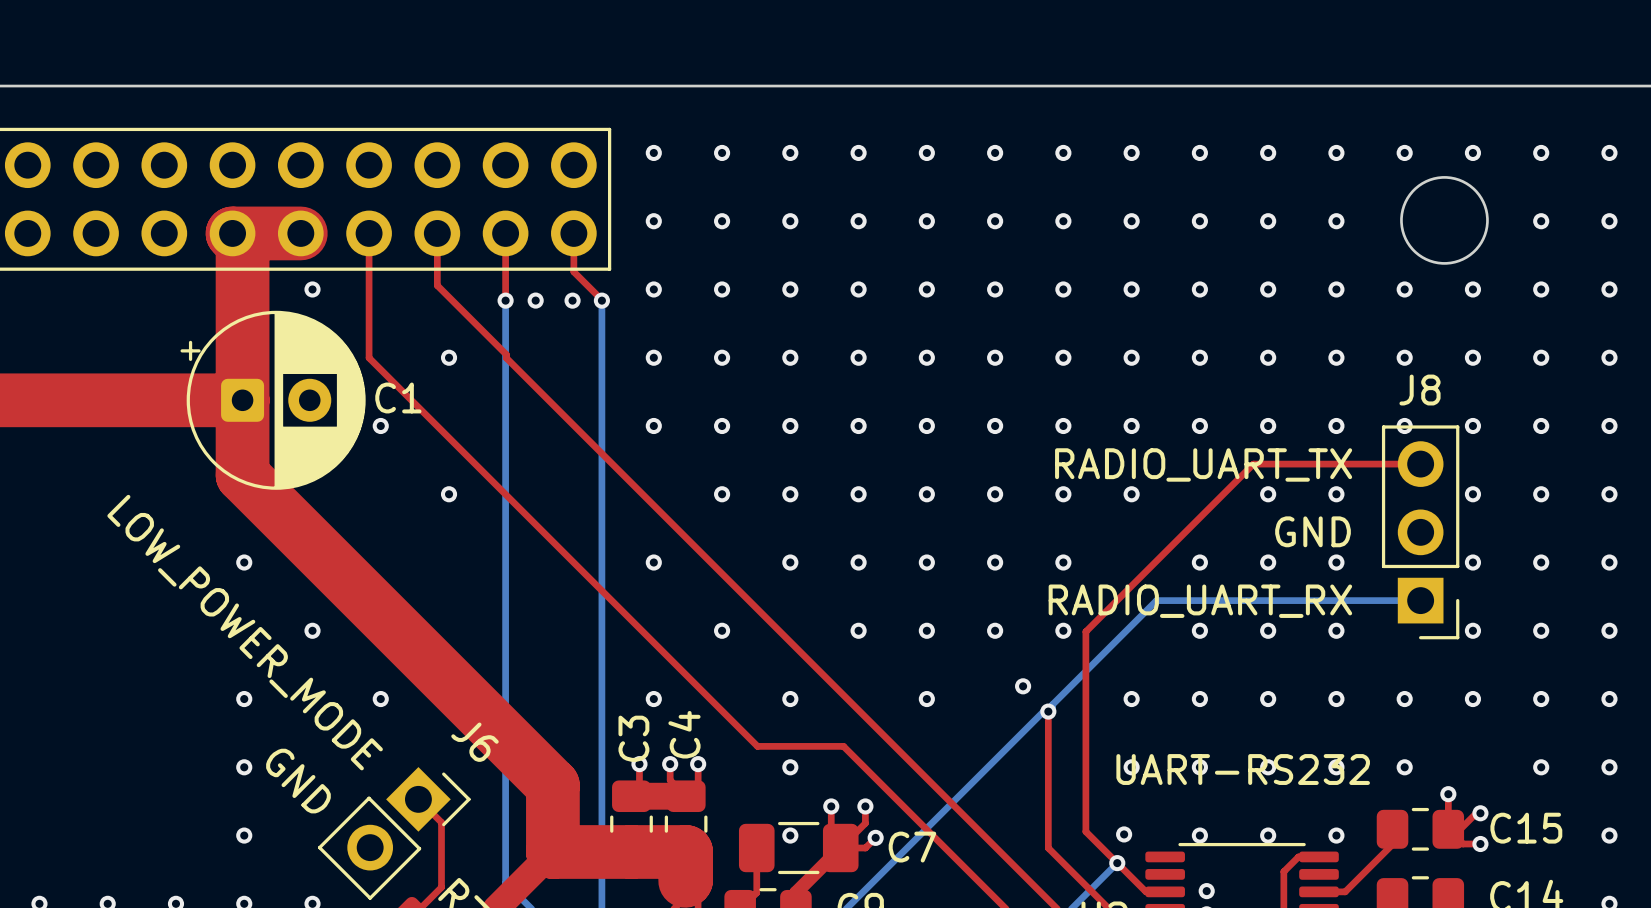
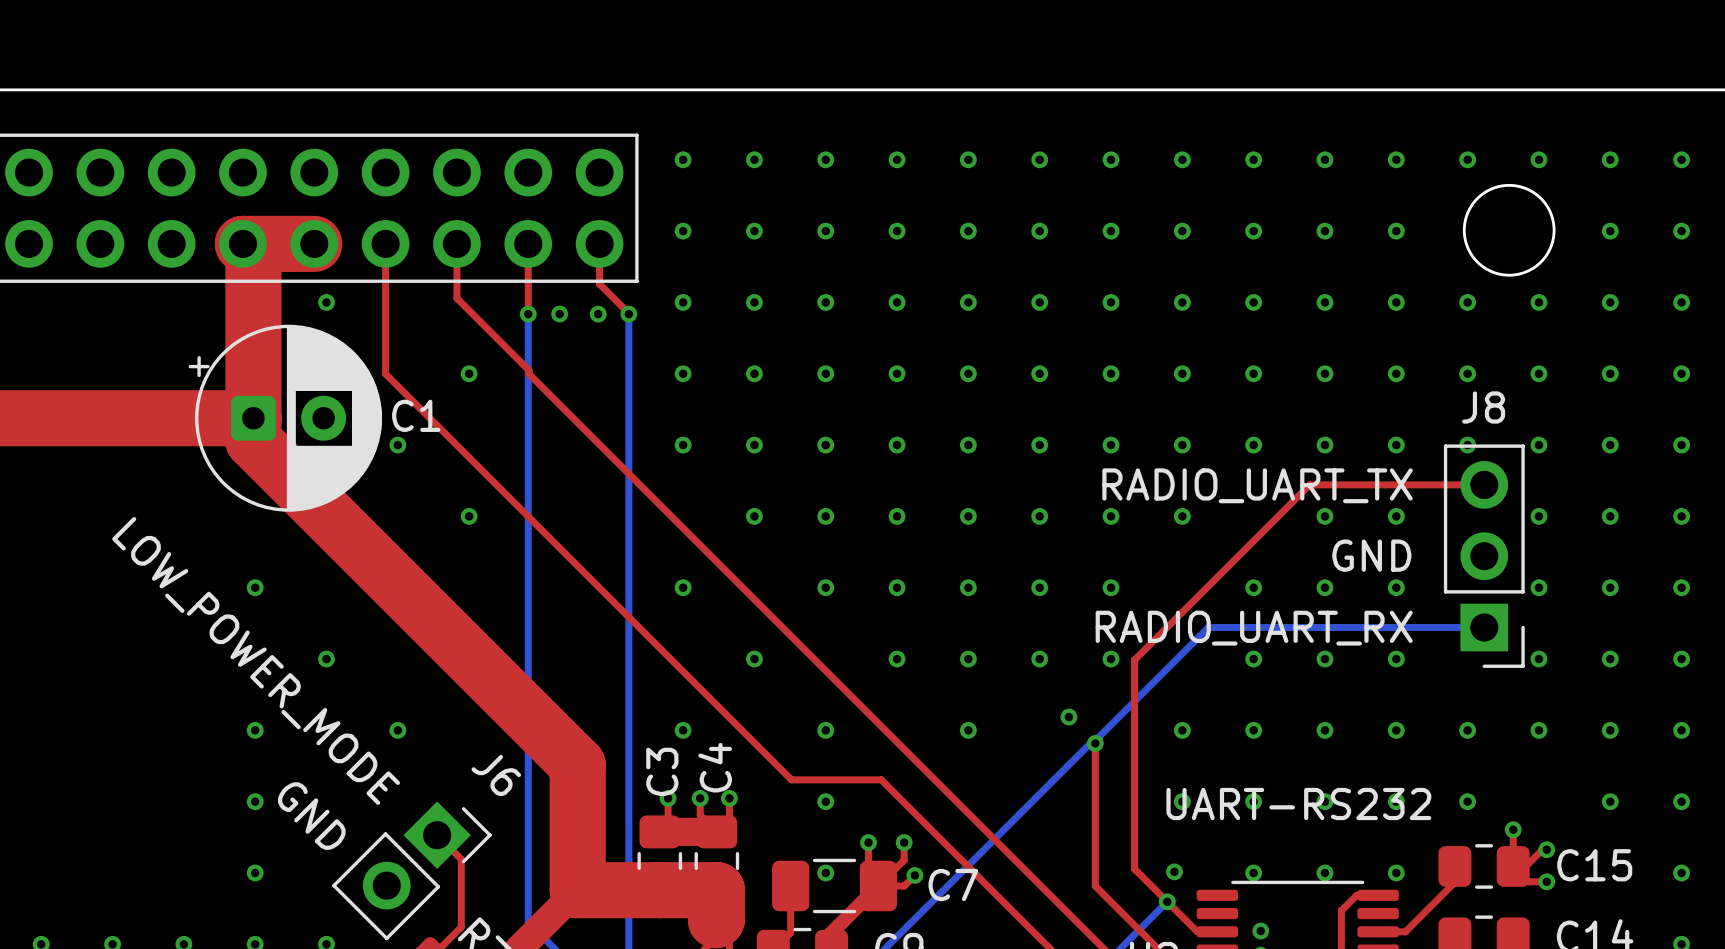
top track: (242, 421) (242, 475) (552, 785) -> (253, 440) (577, 764) (577, 820)

